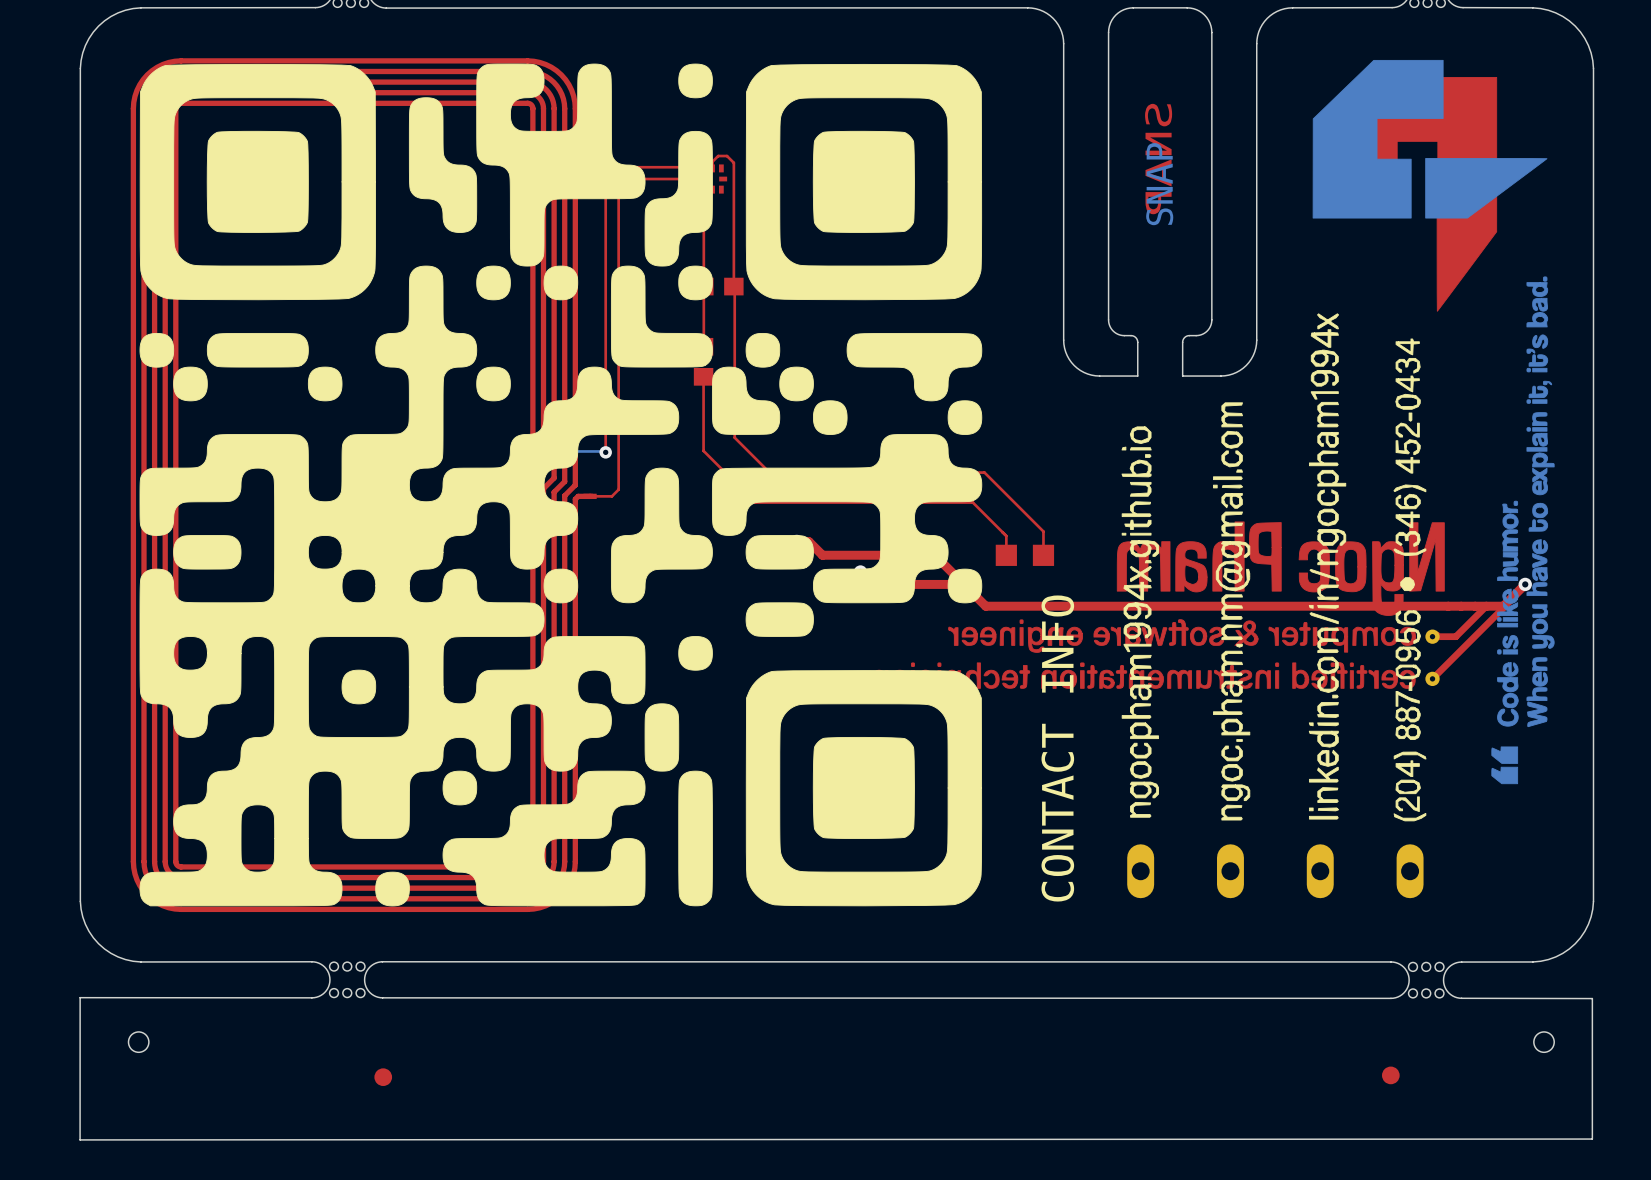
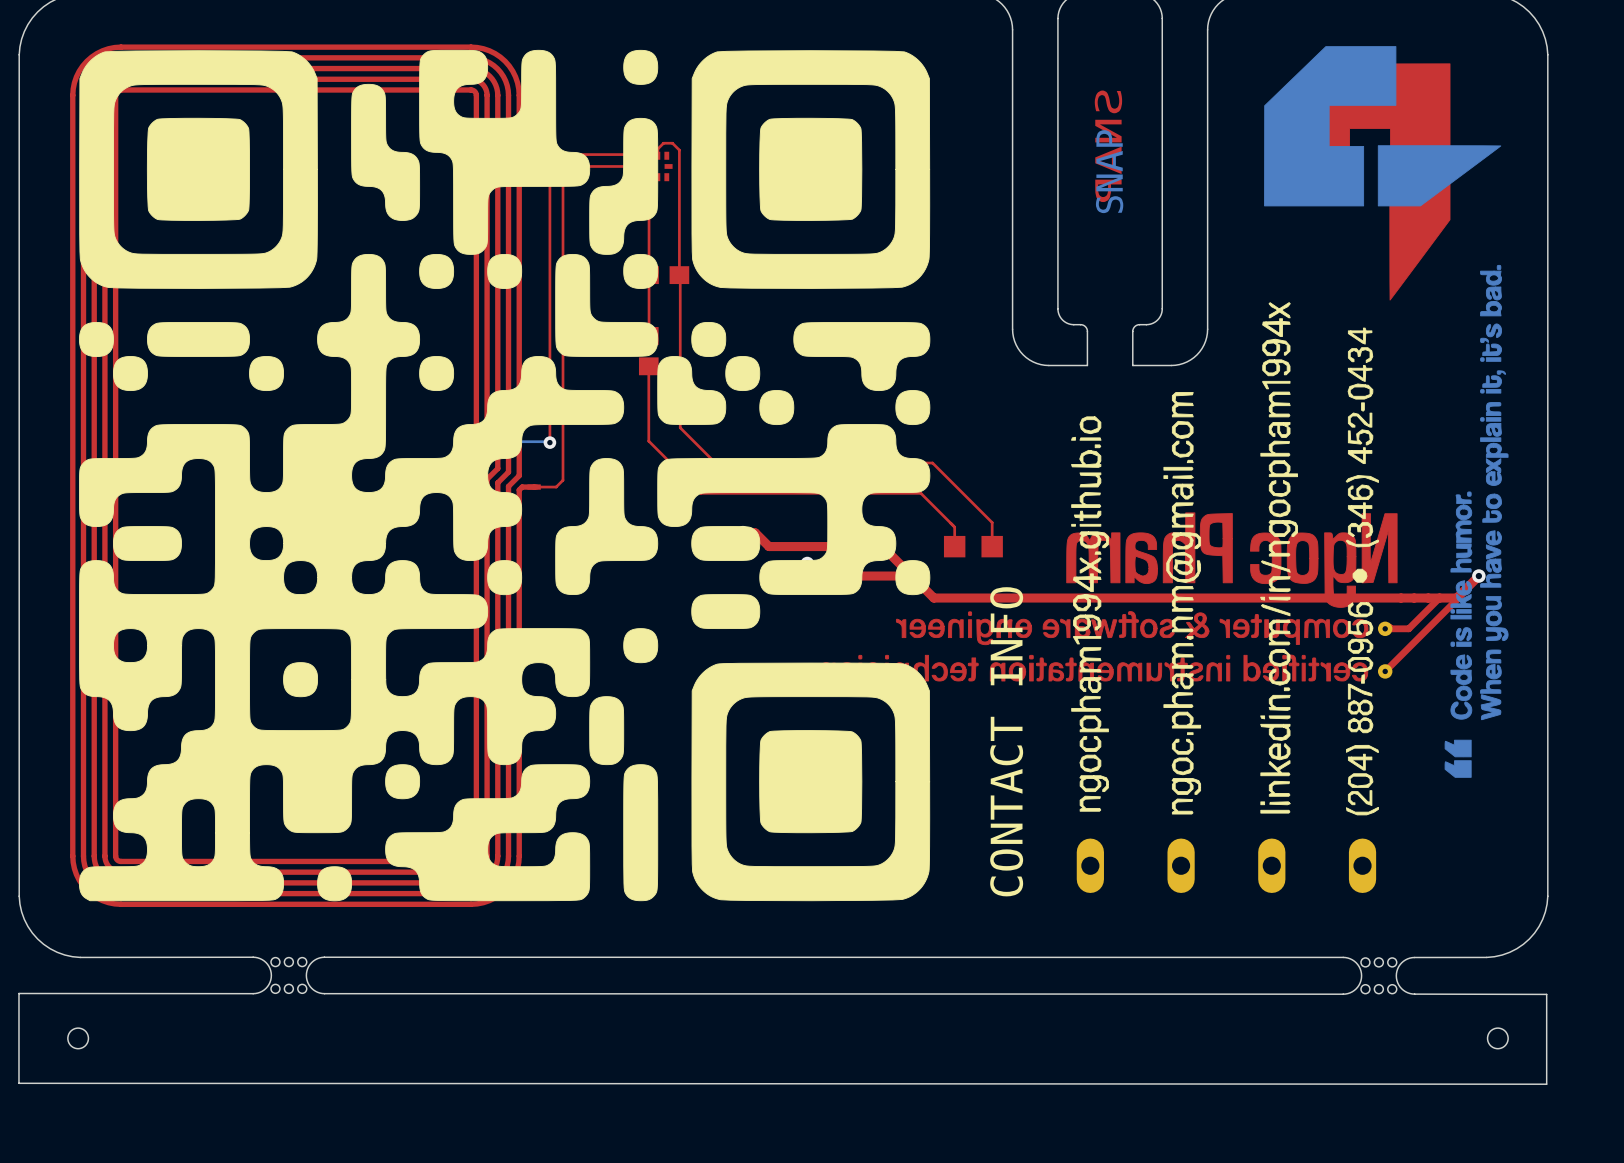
board edge: (80, 997) (80, 1139) (1592, 1139) (1592, 998) -> (18, 993) (18, 1083) (1546, 1084) (1546, 994)
part: (1390, 1075) -> none
part: (383, 1077) -> none

